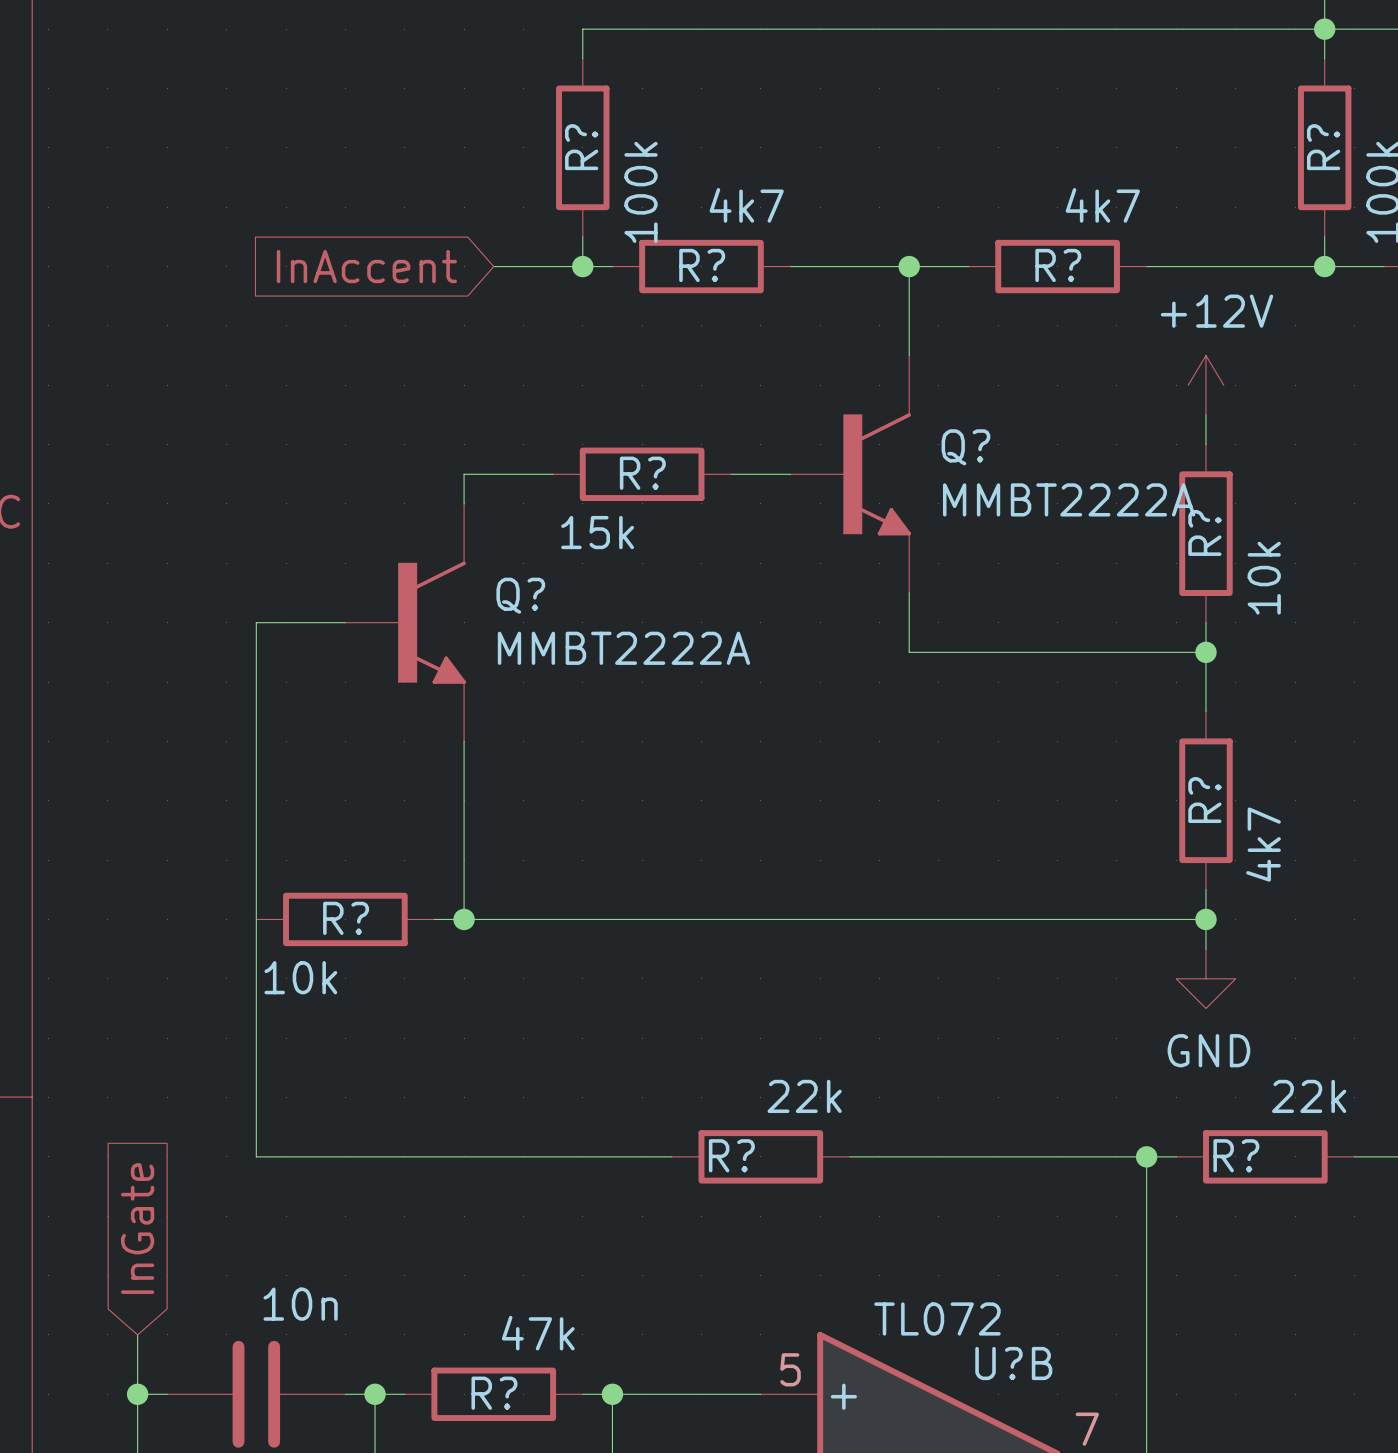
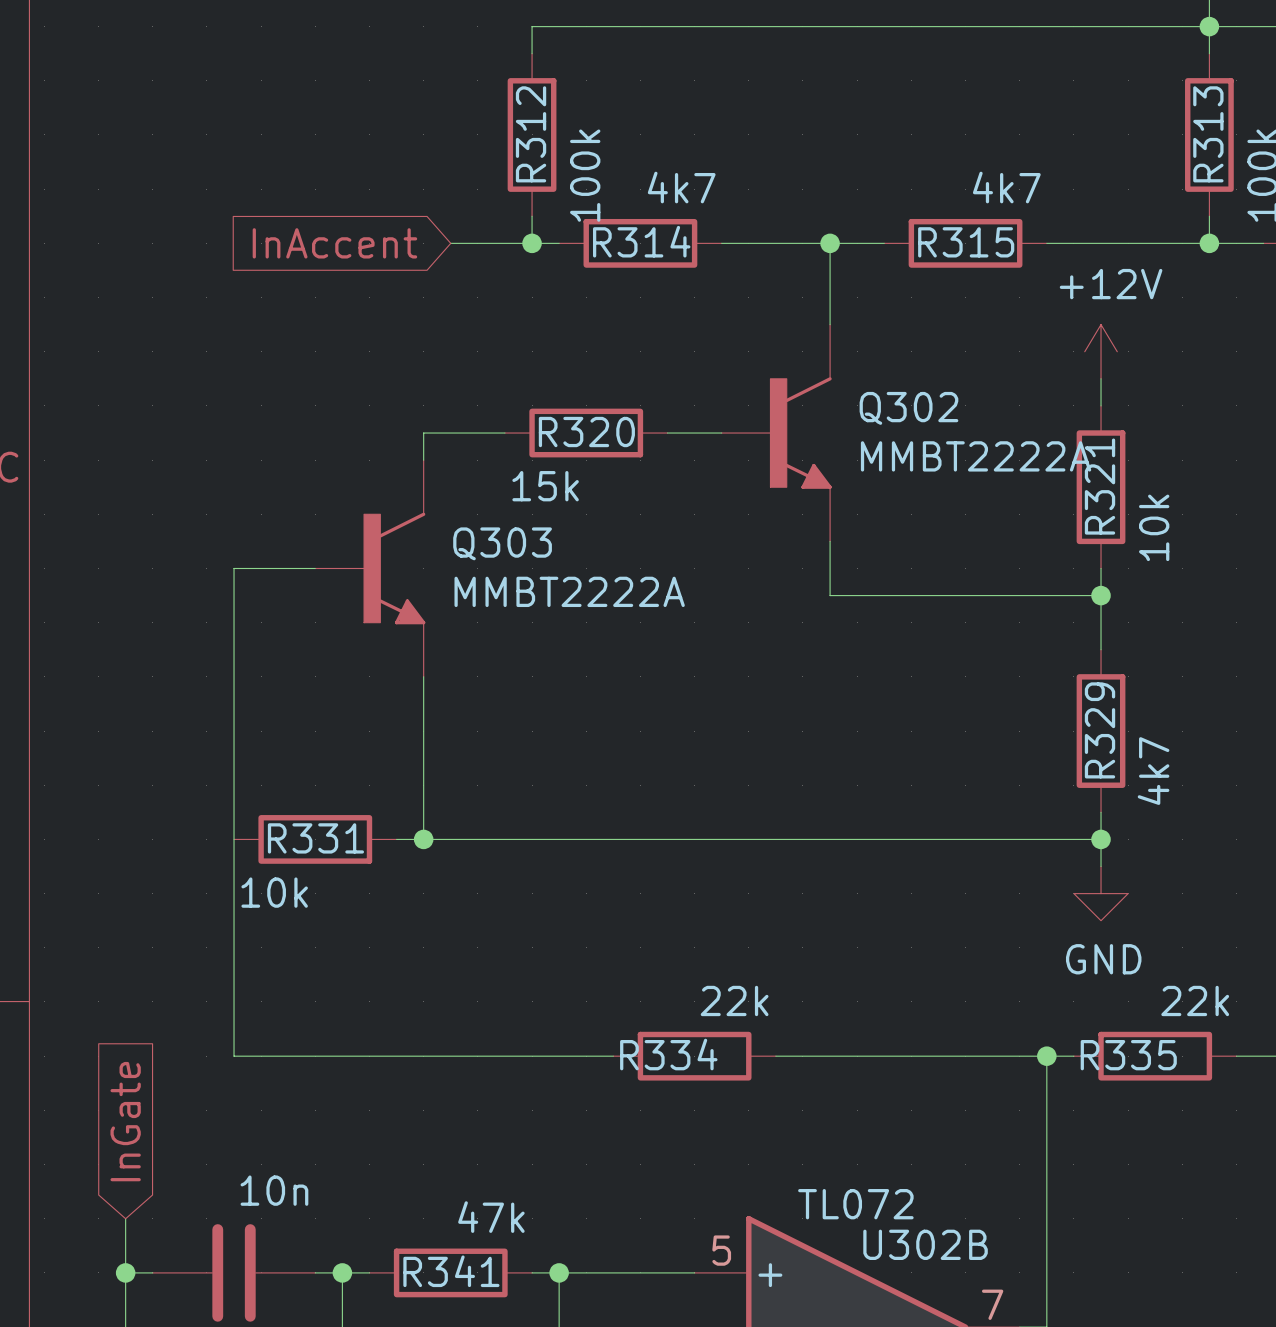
R? name: R? (581, 147) -> R312 (531, 134)
R? name: R? (1323, 147) -> R313 (1208, 134)
R? name: R? (702, 265) -> R314 (641, 241)
R? name: R? (1058, 265) -> R315 (966, 242)
Q? name: Q? (965, 447) -> Q302 (908, 408)
R? name: R? (642, 473) -> R320 (586, 432)
R? name: R? (1204, 532) -> R321 (1100, 486)
Q? name: Q? (520, 595) -> Q303 (502, 543)
R? name: R? (1204, 800) -> R329 (1100, 730)
R? name: R? (346, 918) -> R331 (315, 838)
R? name: R? (731, 1155) -> R334 (668, 1054)
R? name: R? (1236, 1155) -> R335 (1128, 1055)
U?B name: U?B (1013, 1363) -> U302B (925, 1244)
R? name: R? (494, 1393) -> R341 (451, 1271)

